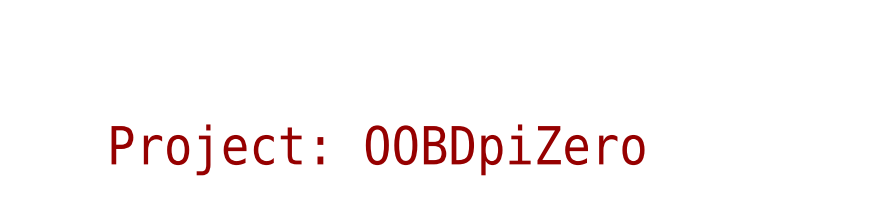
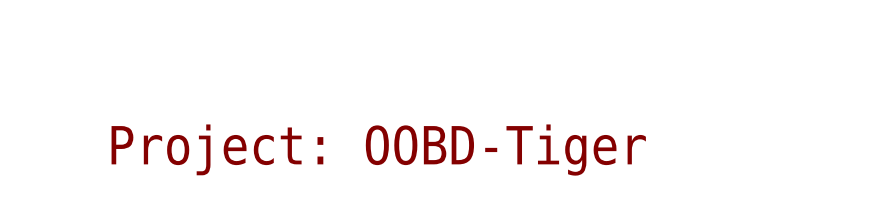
text: Project: OOBDpiZero (378, 149) -> Project: OOBD-Tiger (378, 150)

